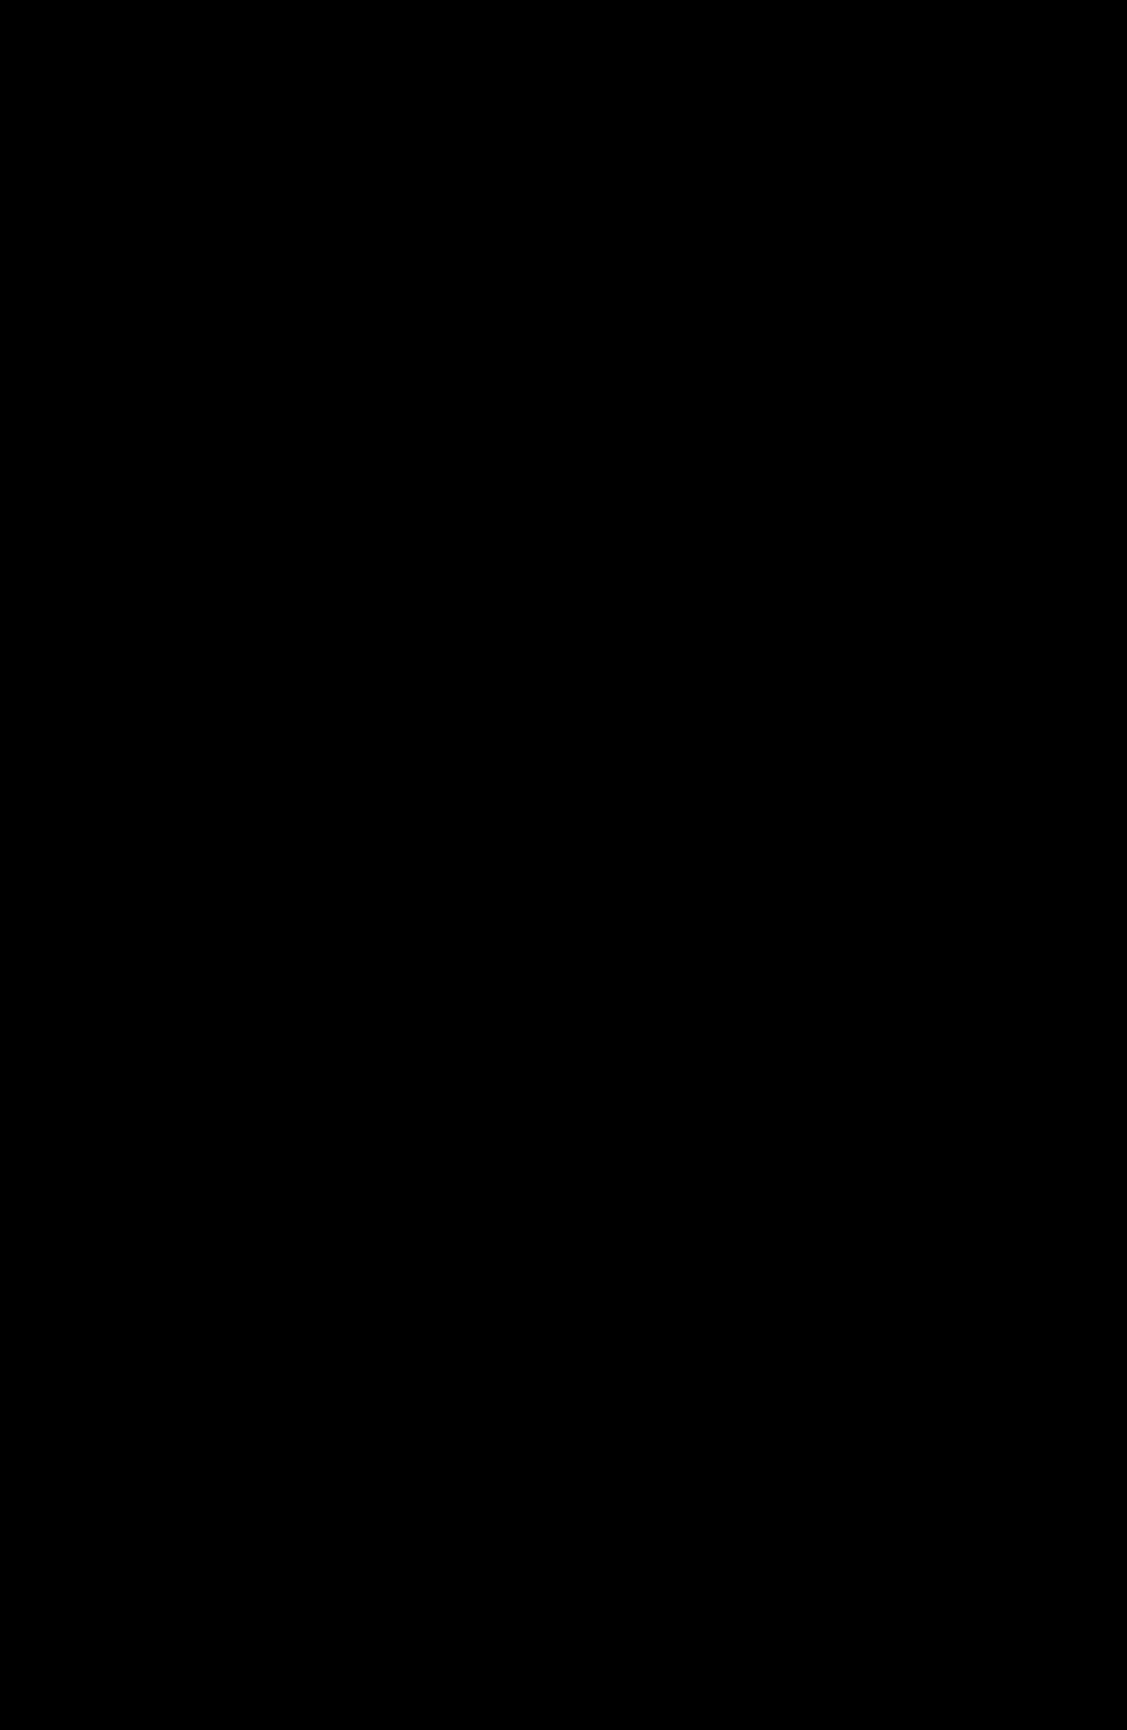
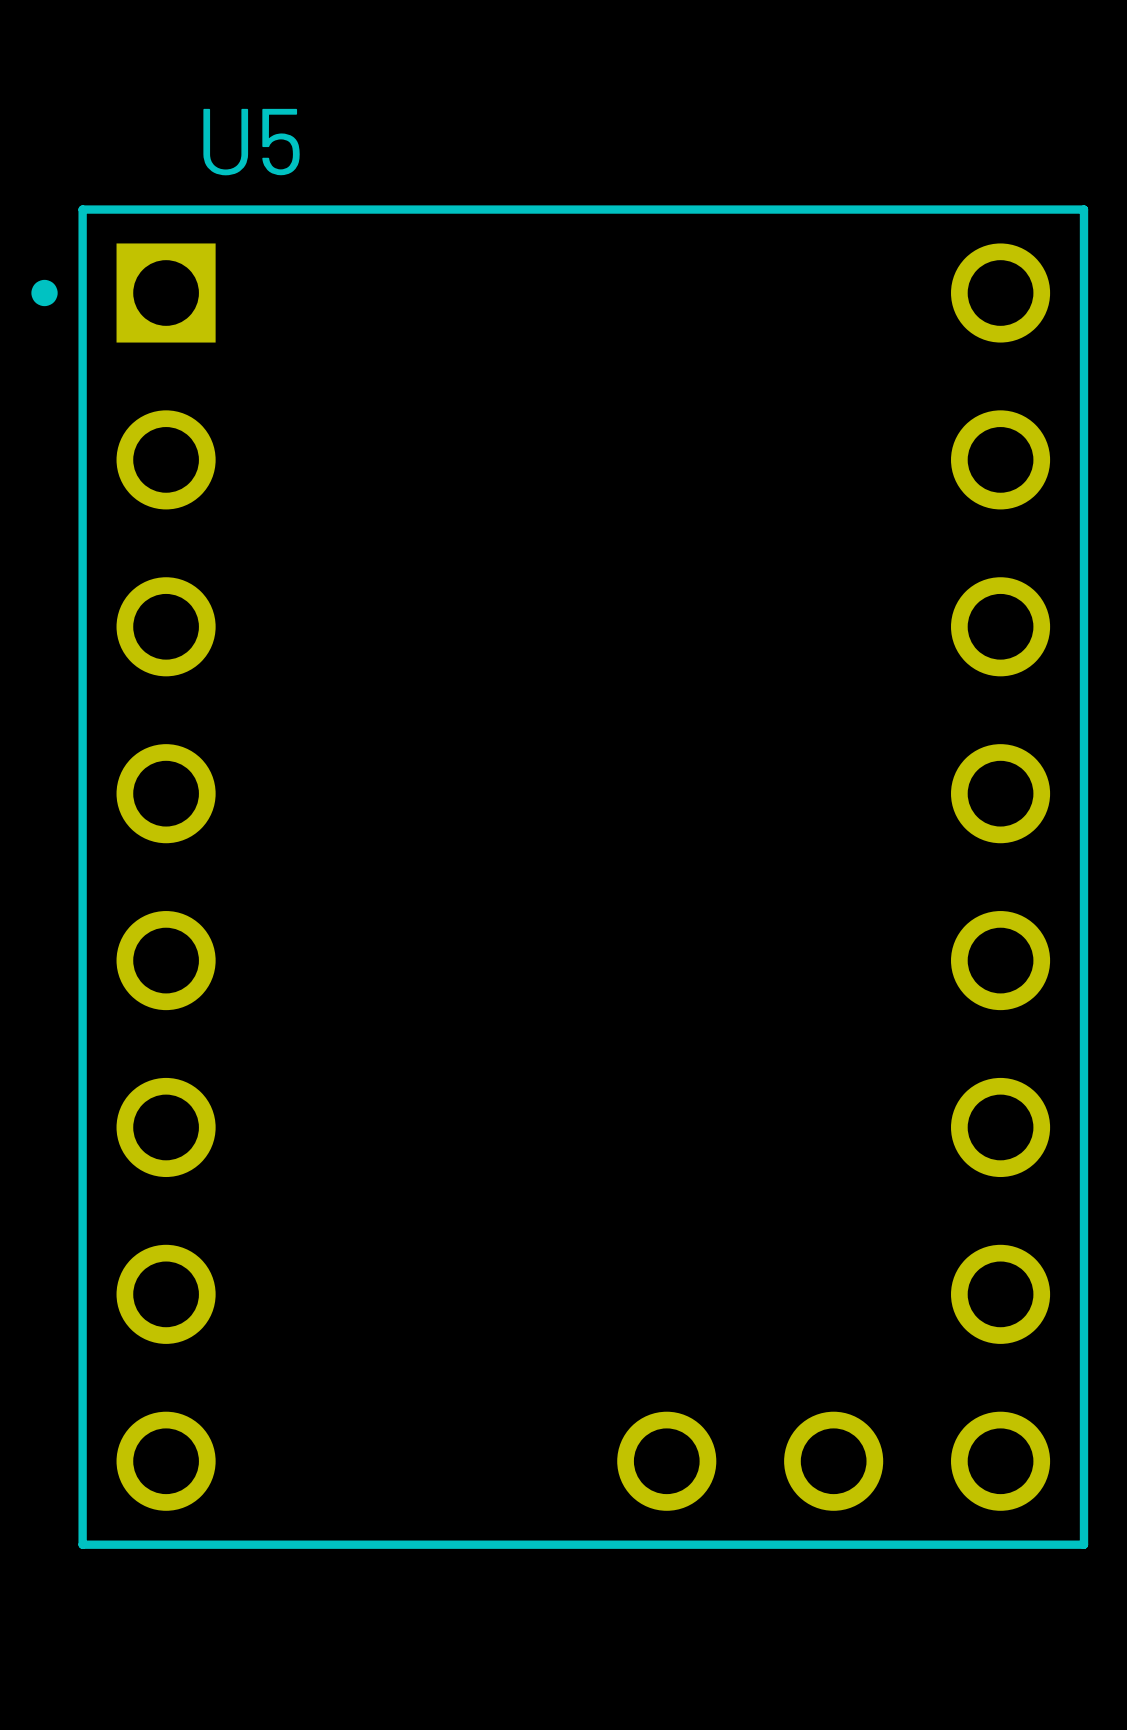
U5: none -> (559, 877)

